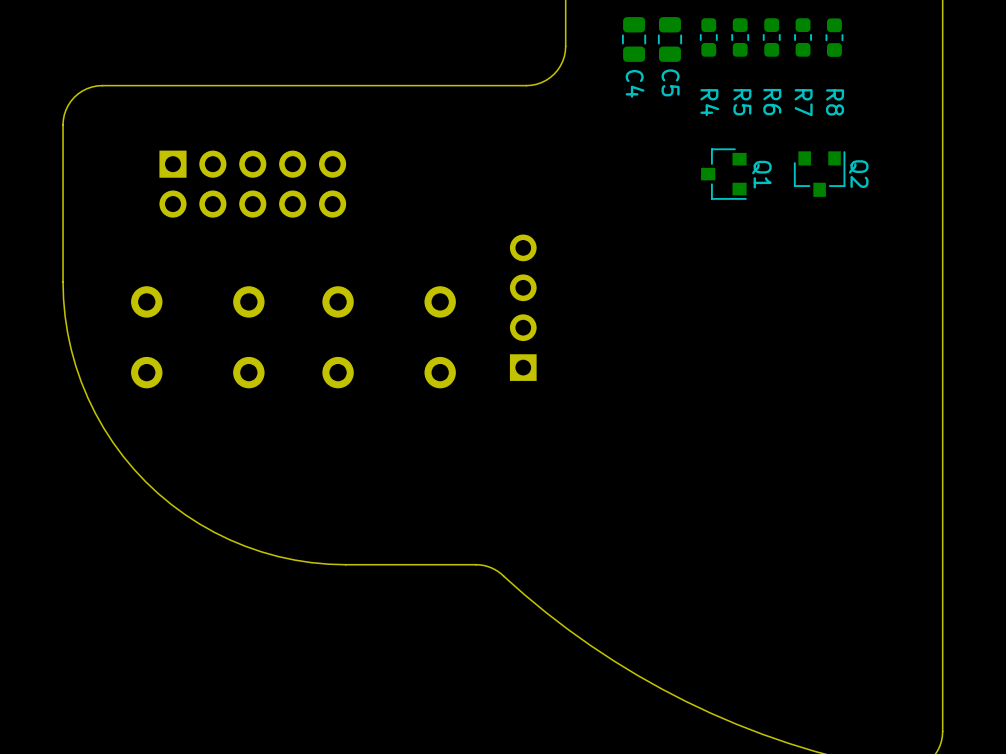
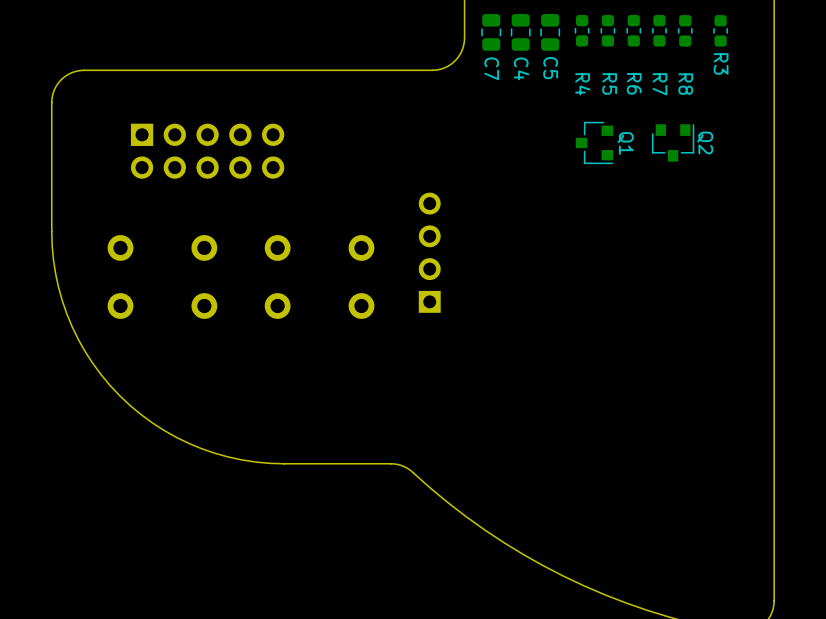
R3: none -> (720, 30)
C7: none -> (491, 32)

